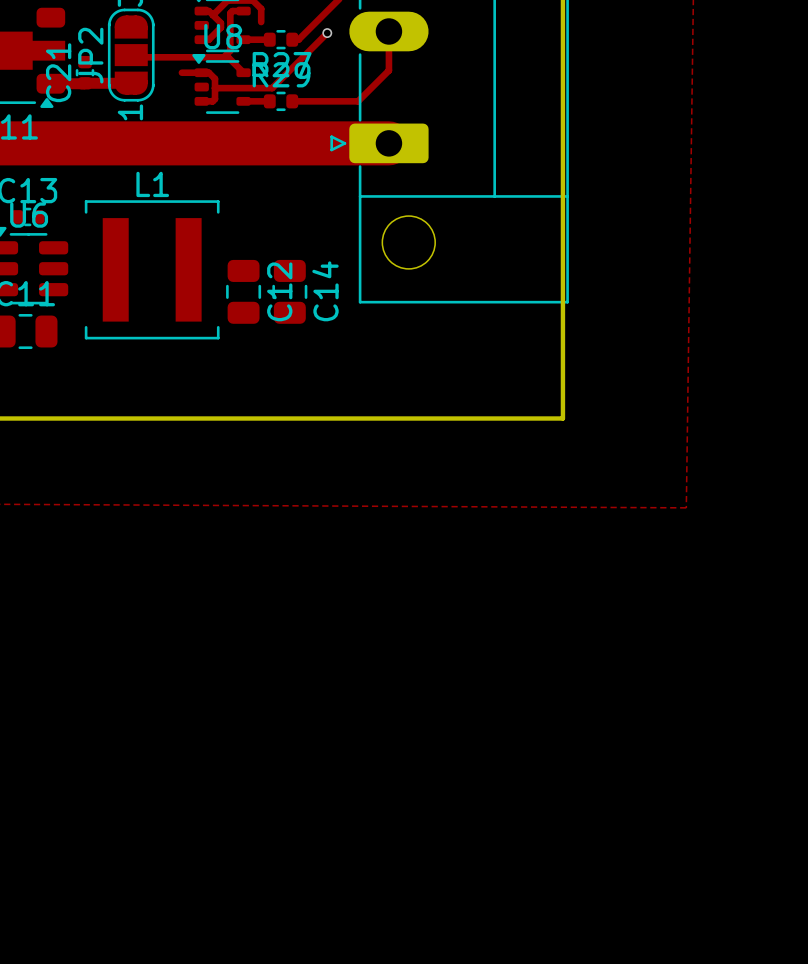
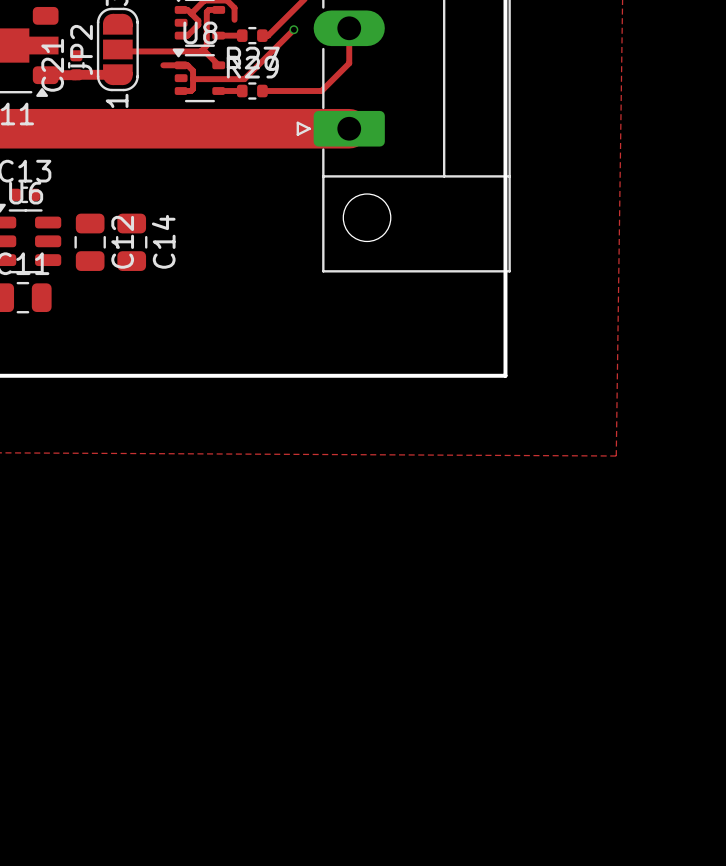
L1: (152, 269) -> none
C12 position: (243, 291) -> (90, 242)
C14 position: (289, 291) -> (131, 242)

